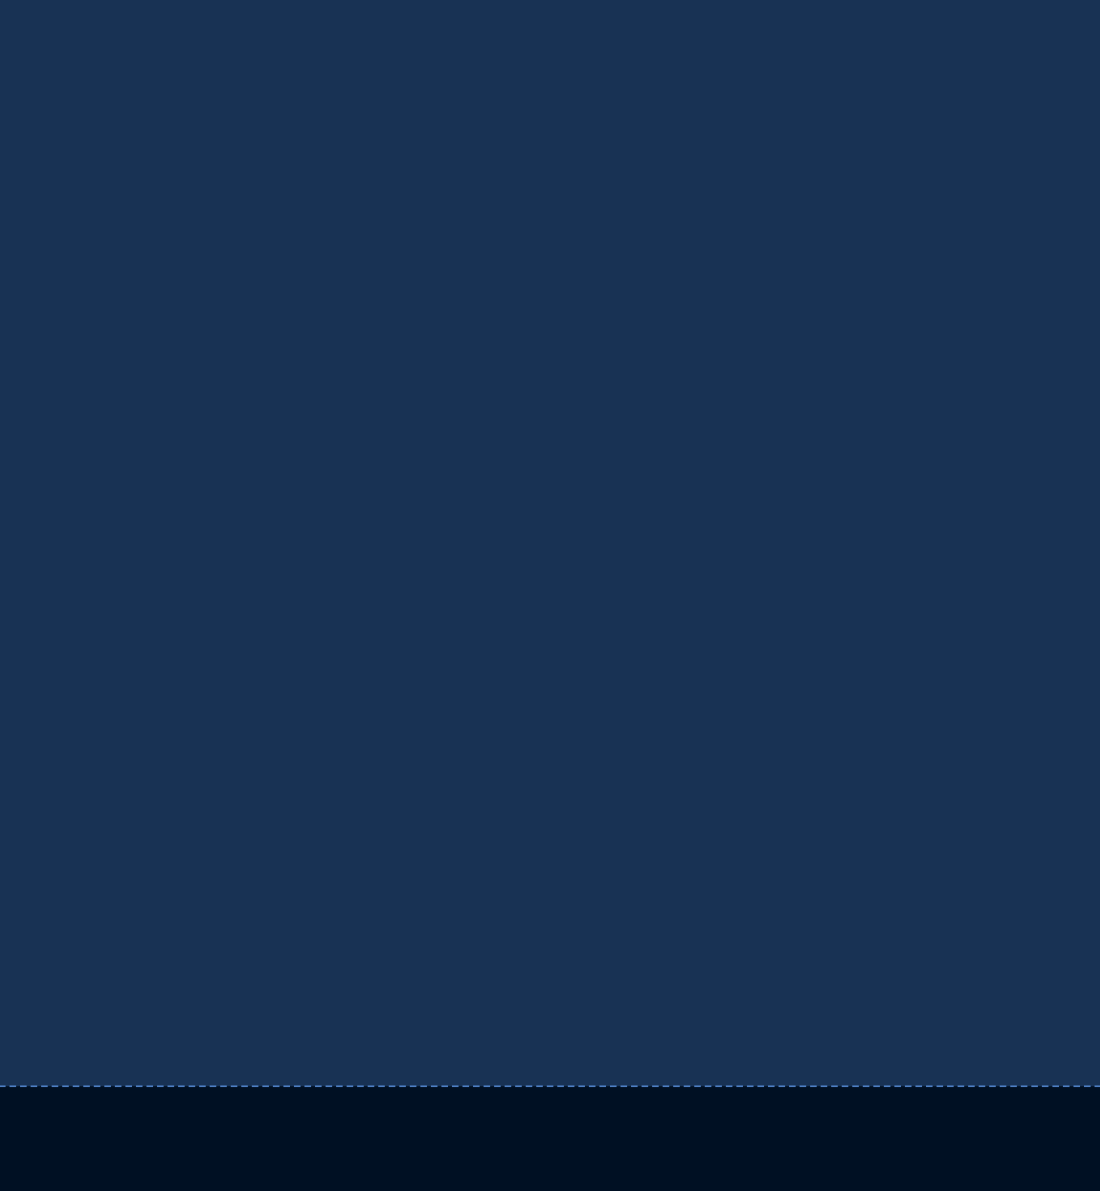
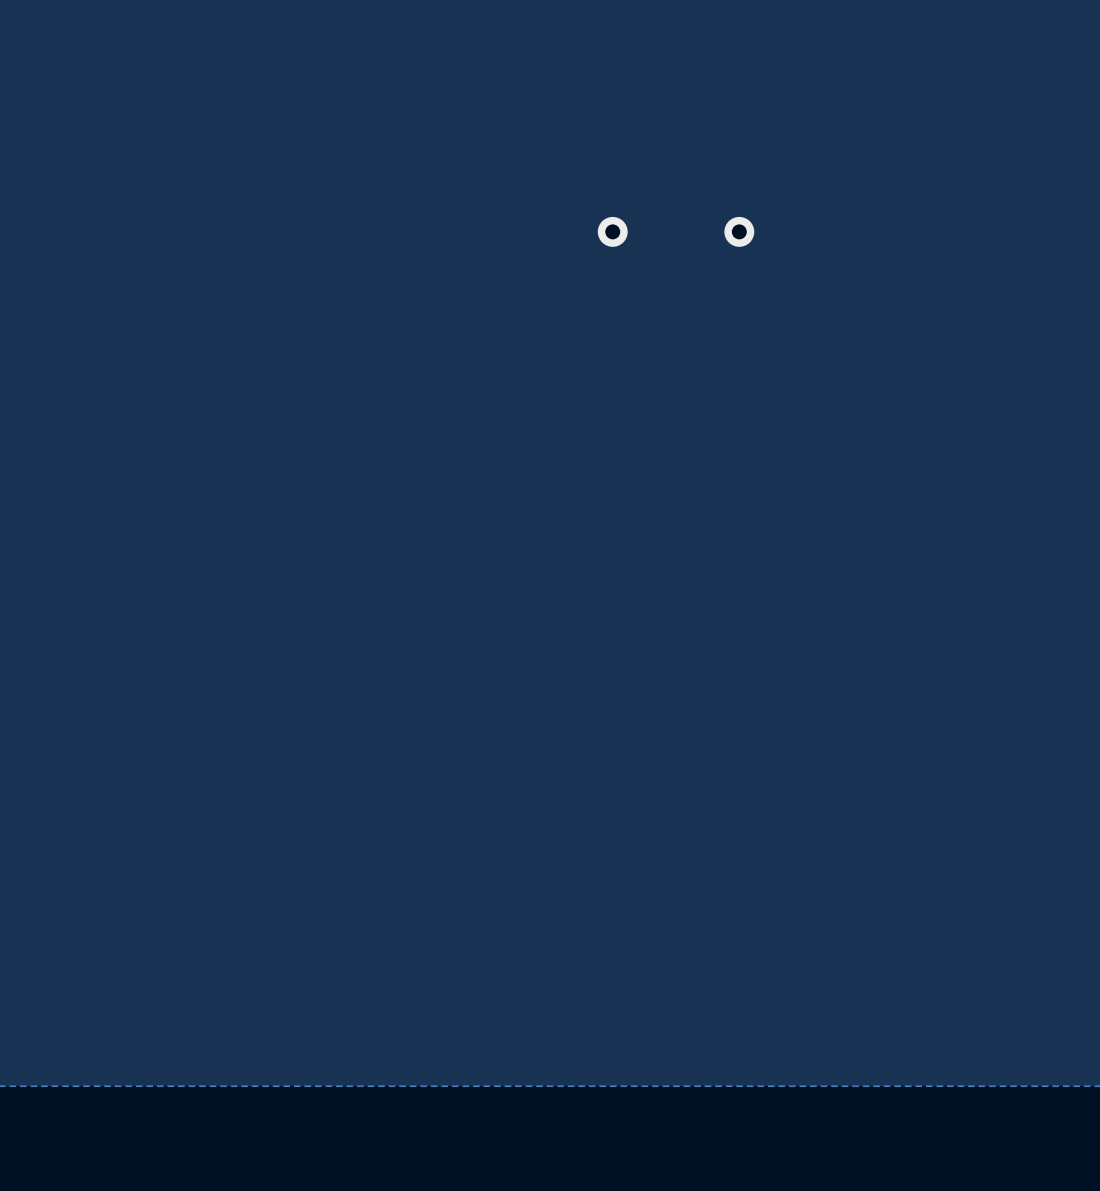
via: none -> (612, 231)
via: none -> (739, 231)

